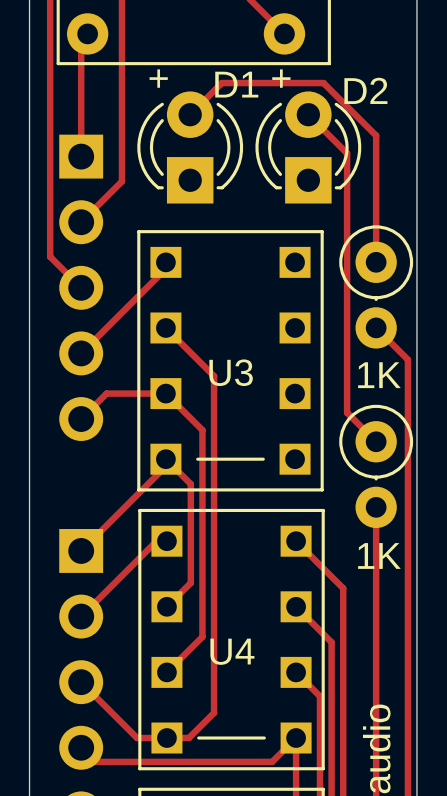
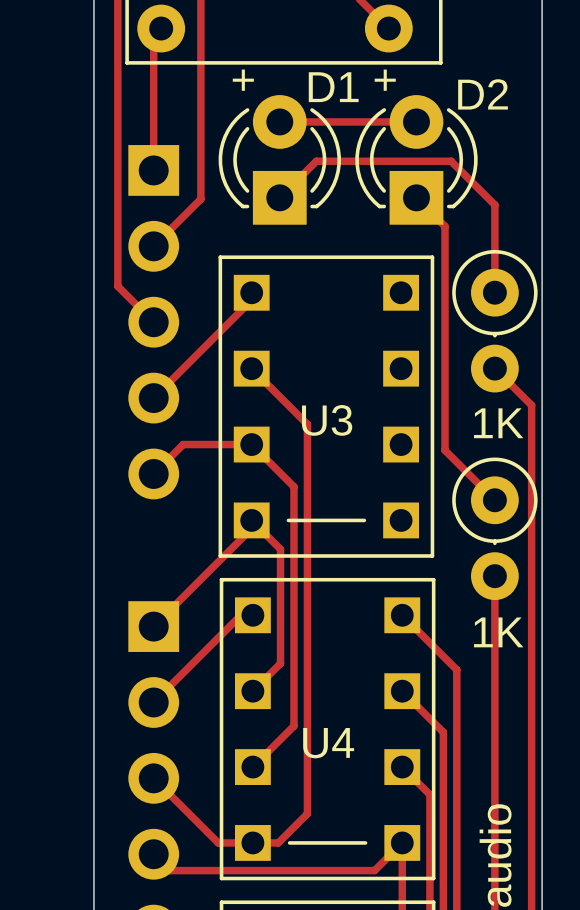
track: (190, 114) (221, 83) (323, 83) (376, 135) (376, 186) -> (279, 197) (316, 161) (451, 161) (494, 205)
track: none -> (279, 121) (416, 121)
track: (308, 114) (347, 153) (347, 412) -> (416, 197) (445, 226) (445, 450) (461, 466)

